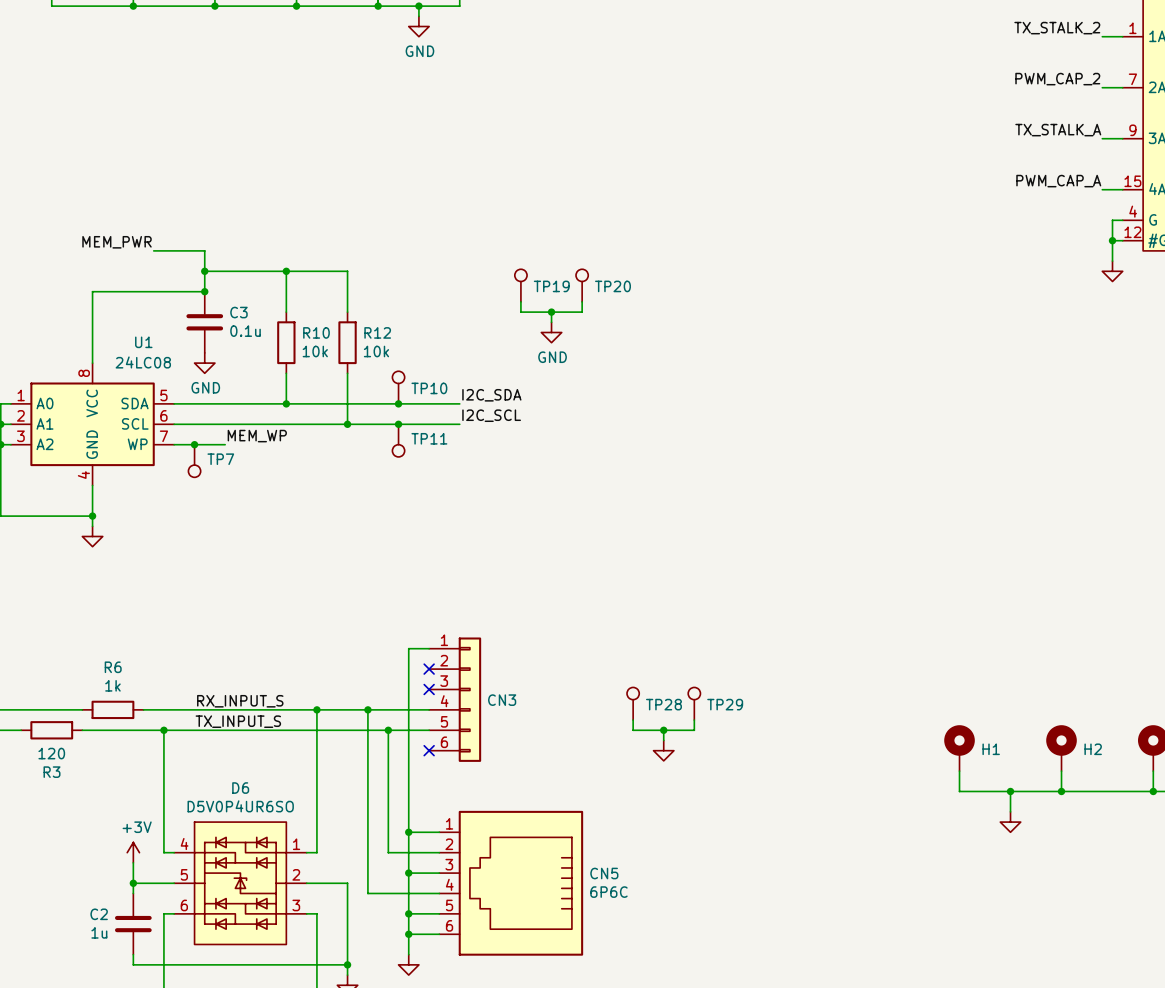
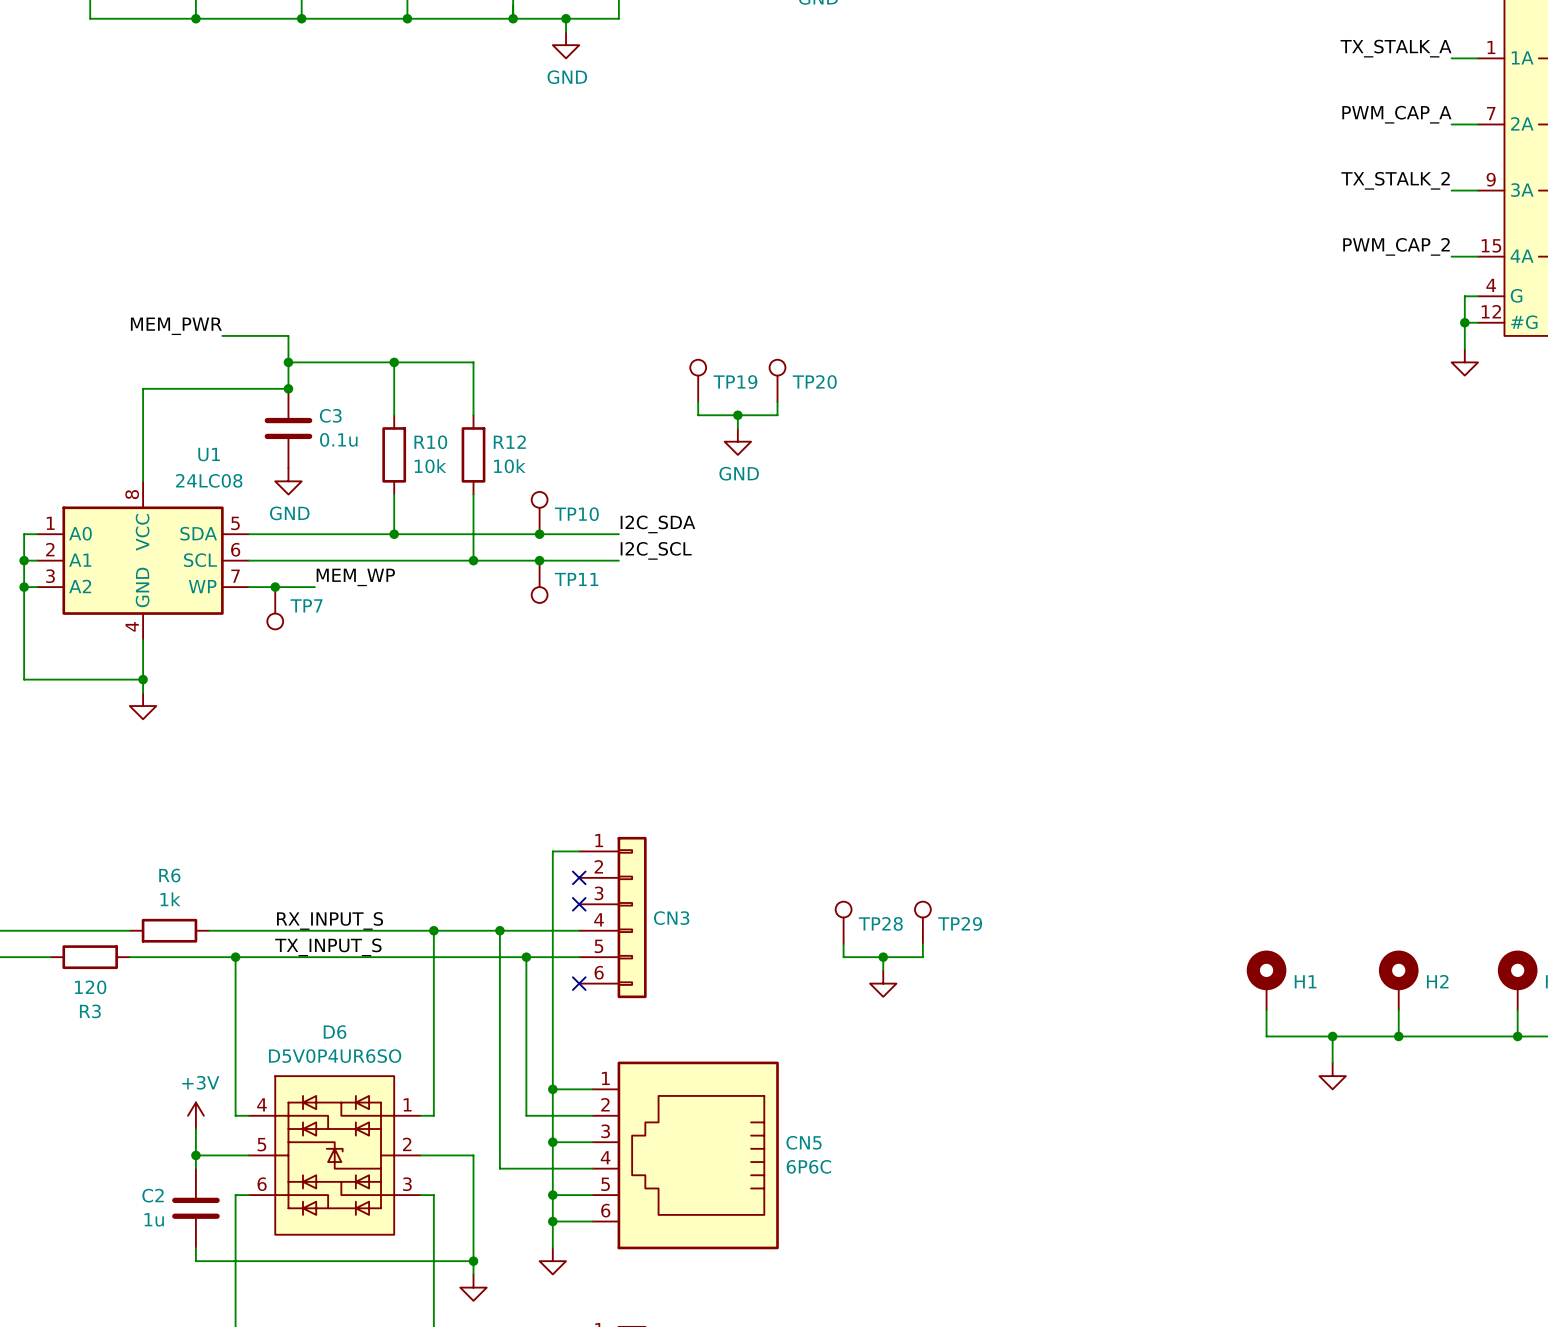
label: TX_STALK_2 (1057, 28) -> TX_STALK_A (1395, 48)
label: PWM_CAP_2 (1057, 79) -> PWM_CAP_A (1396, 114)
label: TX_STALK_A (1058, 130) -> TX_STALK_2 (1395, 180)
label: PWM_CAP_A (1058, 181) -> PWM_CAP_2 (1396, 246)

